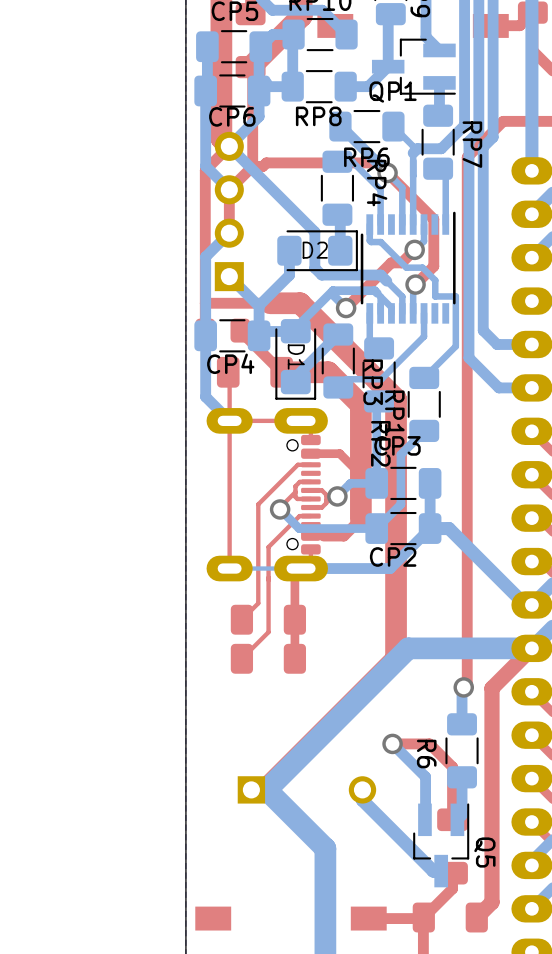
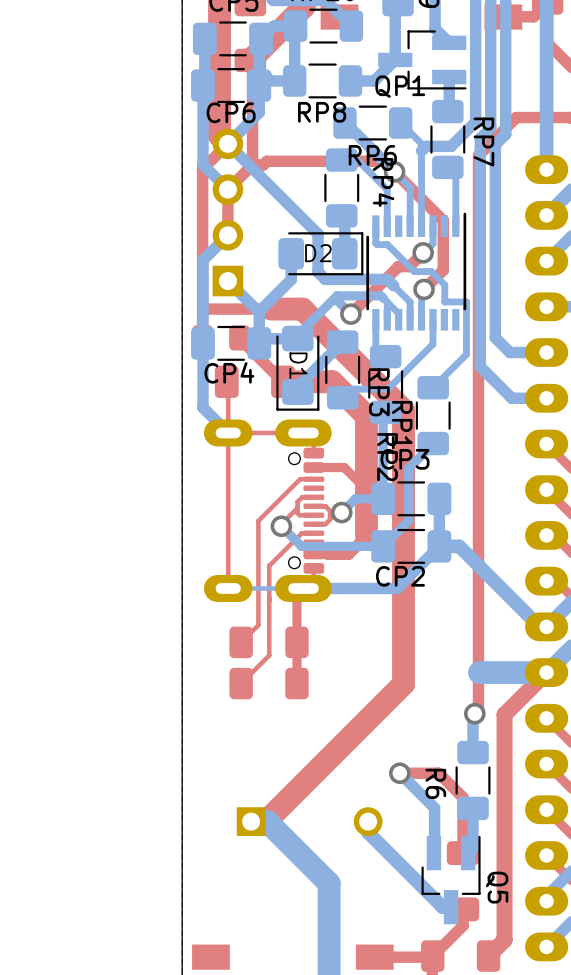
bottom track: (468, 648) (408, 648) (266, 789) -> none

